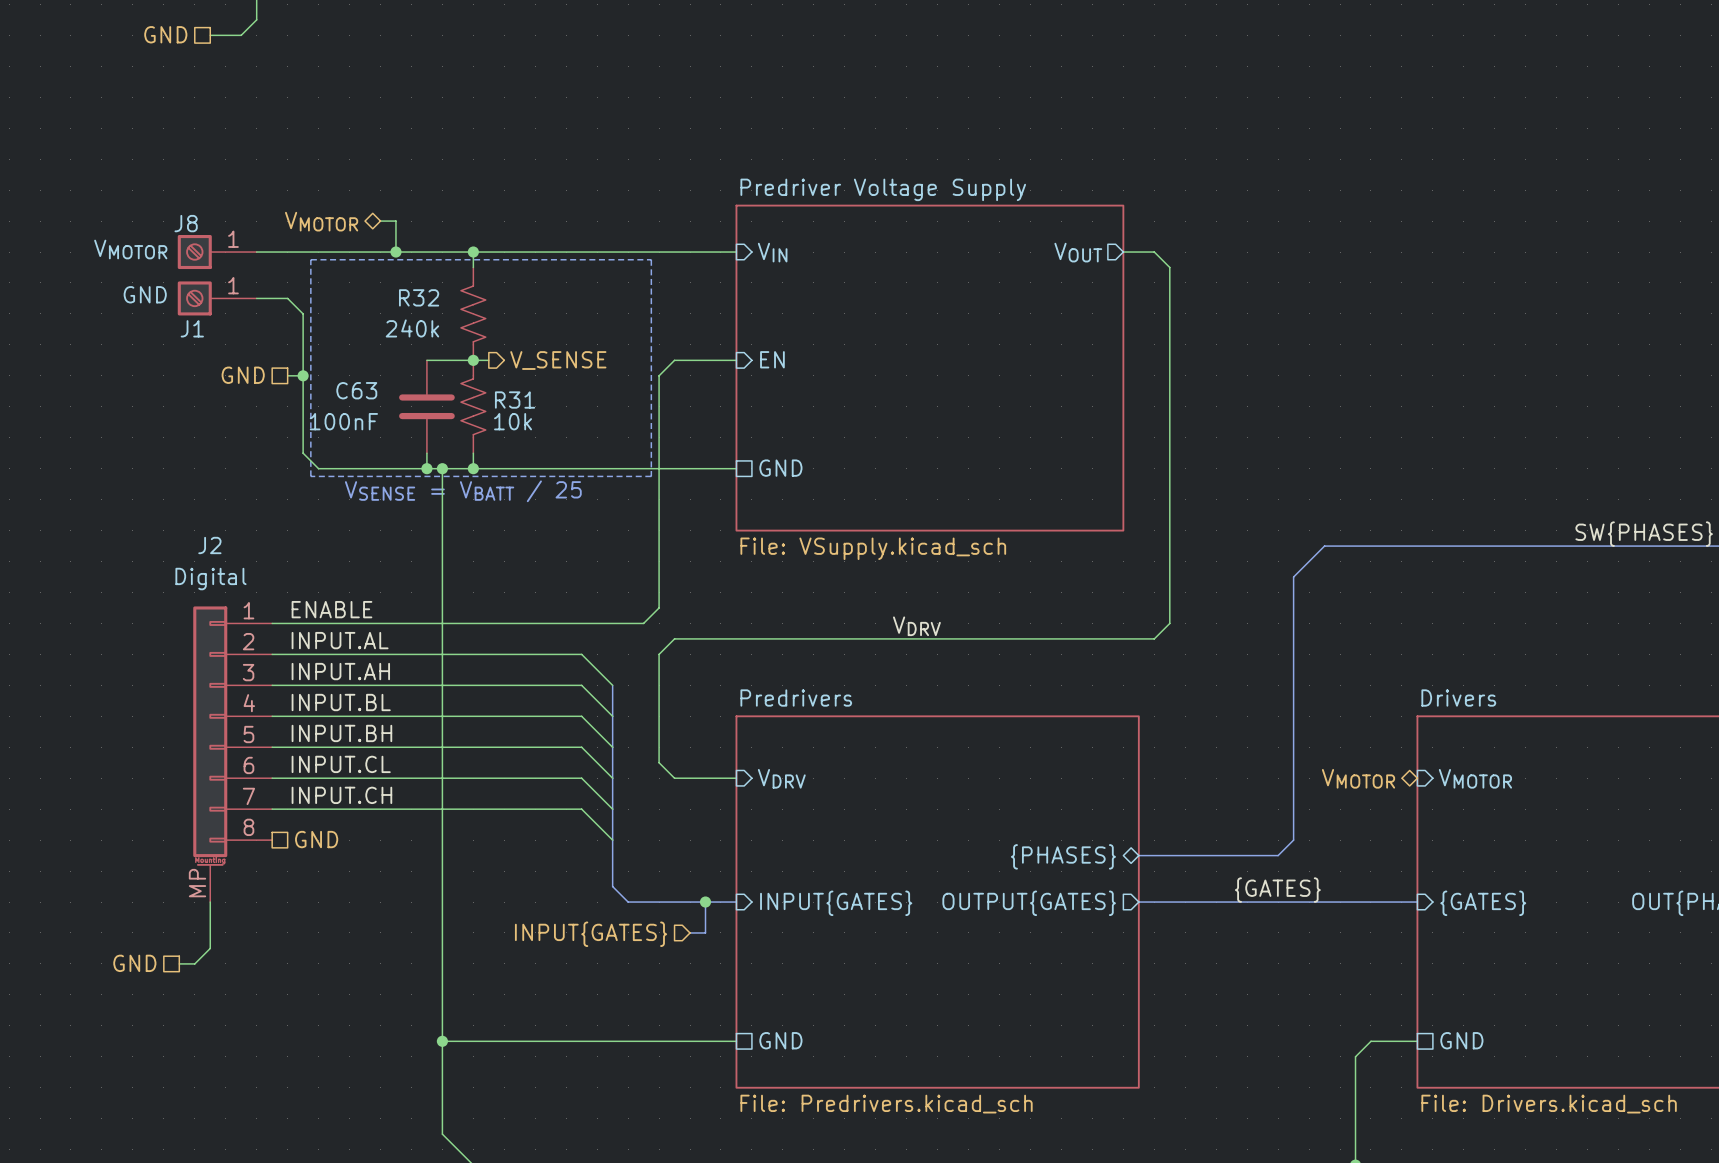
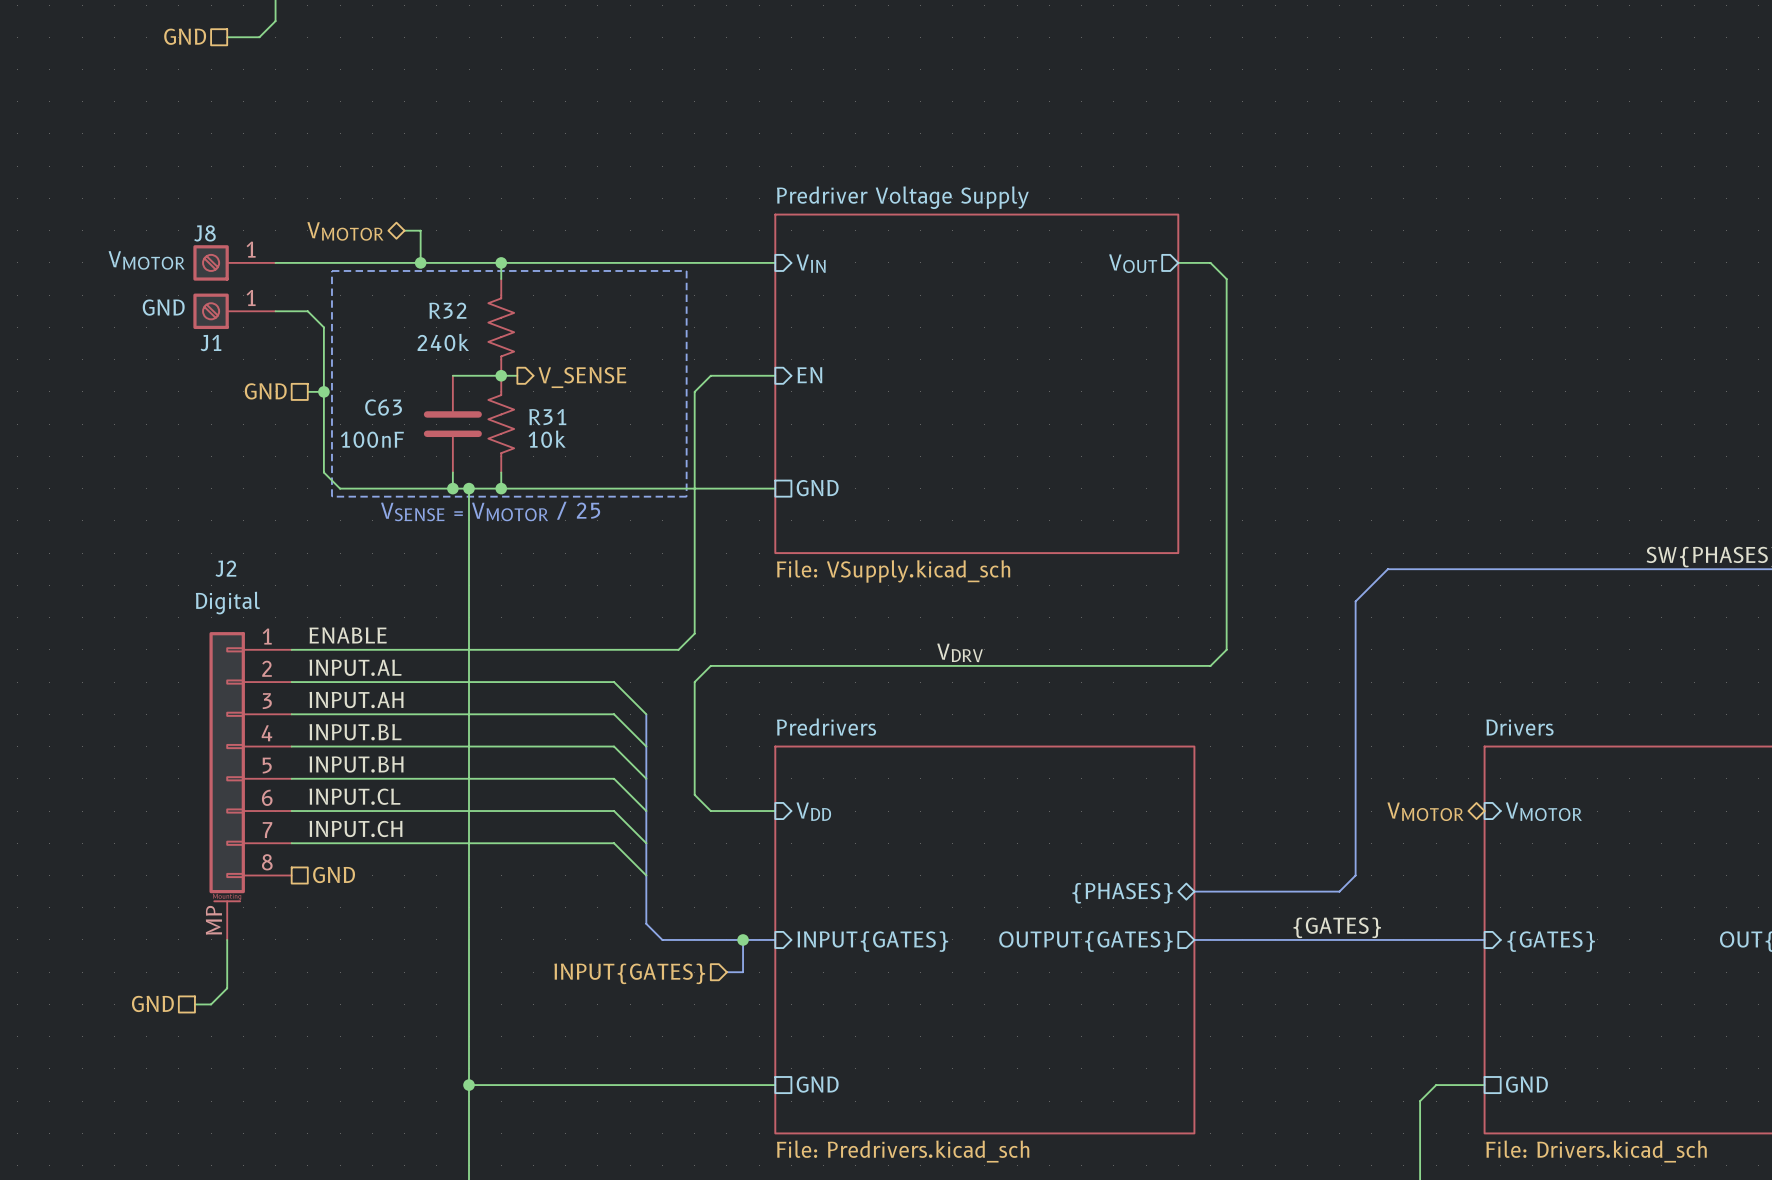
text: VSENSE = VBATT / 25 (463, 491) -> VSENSE = VMOTOR / 25 (490, 511)
sheet pin: VDRV (781, 778) -> VDD (813, 811)

